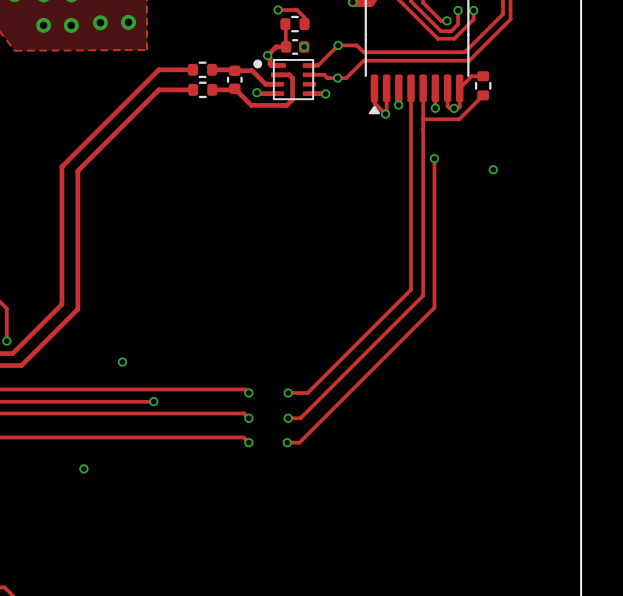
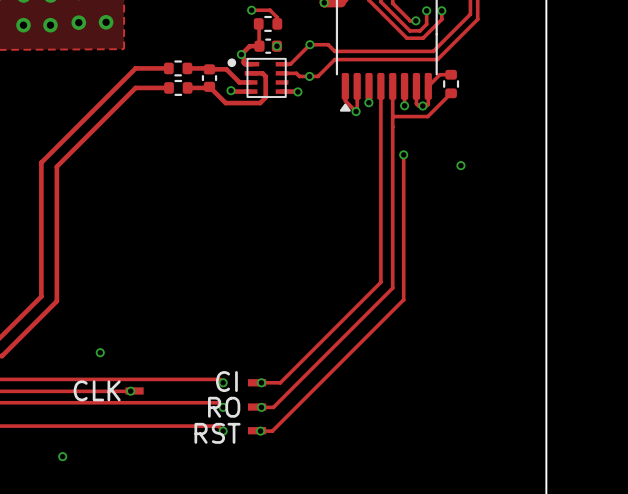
part: none -> CI (257, 382)
part: none -> CLK (134, 390)
part: none -> RO (257, 407)
part: none -> RST (257, 430)

